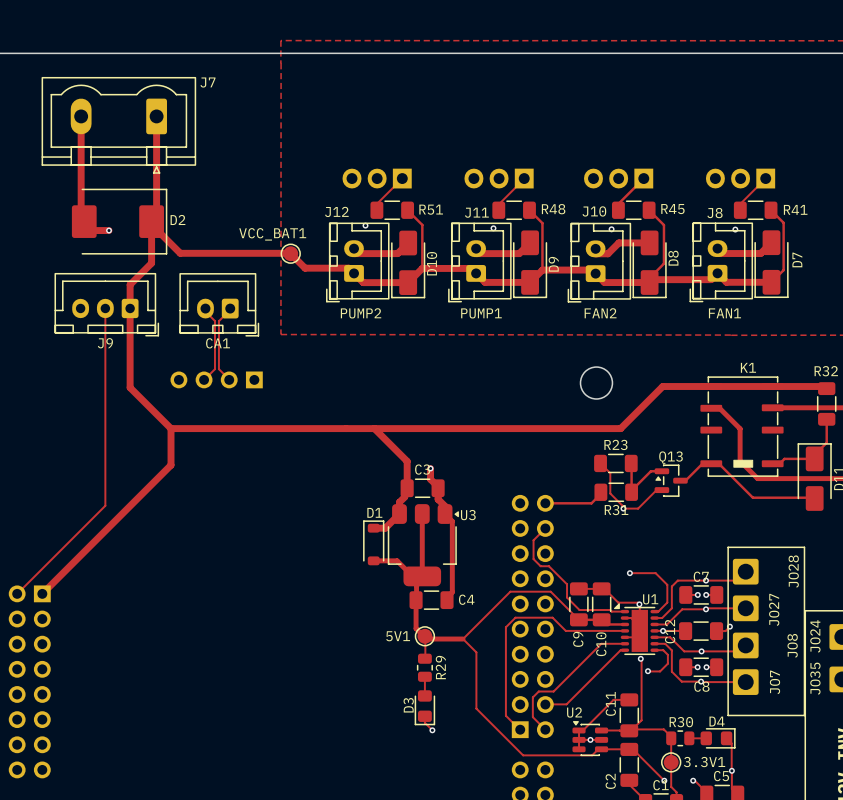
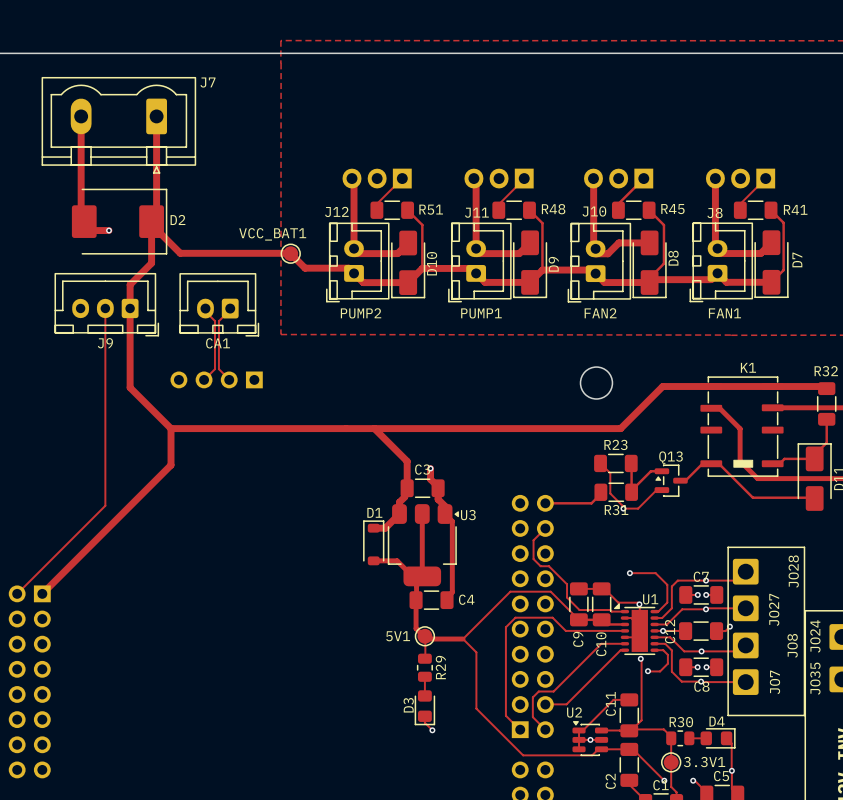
track: none -> (593, 178) (593, 251)
track: none -> (715, 178) (715, 248)
track: none -> (354, 180) (354, 253)
track: none -> (476, 180) (476, 253)
via: (365, 225) -> none
via: (493, 228) -> none
via: (611, 229) -> none
via: (735, 229) -> none

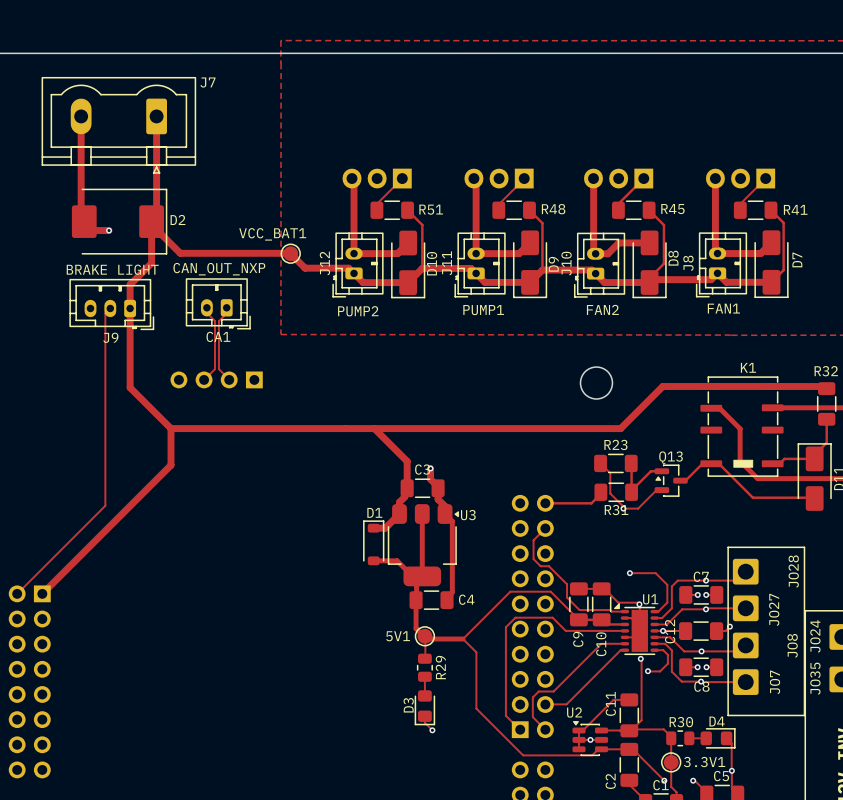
J12 name position: J12 (336, 211) -> J12 (324, 263)
J10 name position: J10 (594, 211) -> J10 (566, 263)
J11 name position: J11 (476, 212) -> J11 (447, 263)
J8 name position: J8 (714, 213) -> J8 (688, 263)
J12 footprint: [326, 222, 390, 303] -> [332, 232, 384, 298]
J11 footprint: [448, 222, 512, 303] -> [454, 232, 506, 298]
J10 footprint: [567, 222, 631, 303] -> [574, 232, 626, 298]
J8 footprint: [689, 222, 753, 303] -> [696, 232, 747, 298]
J9 value: none -> BRAKE LIGHT (112, 269)
CA1 value: none -> CAN_OUT_NXP (219, 269)
J9 footprint: [54, 273, 159, 337] -> [69, 279, 155, 330]
CA1 footprint: [179, 273, 260, 337] -> [185, 278, 251, 330]

